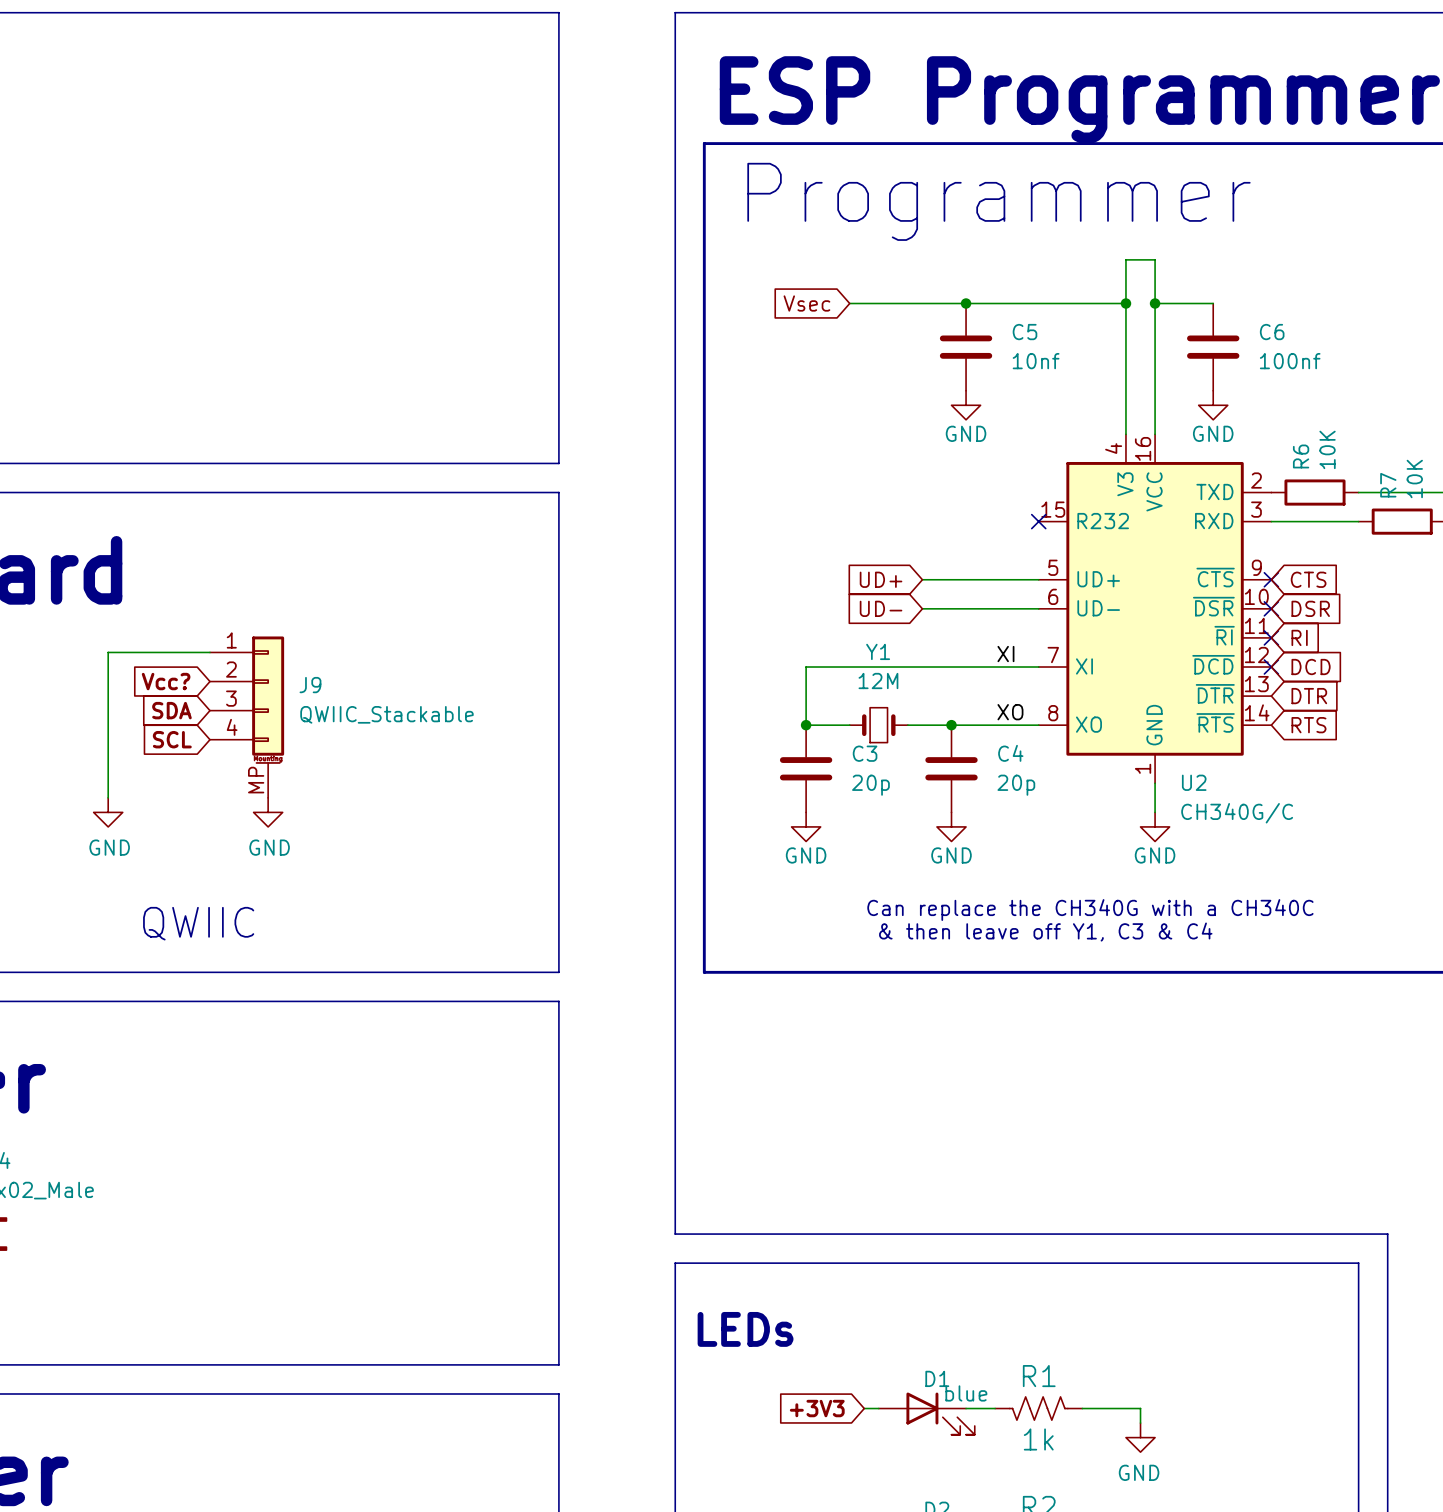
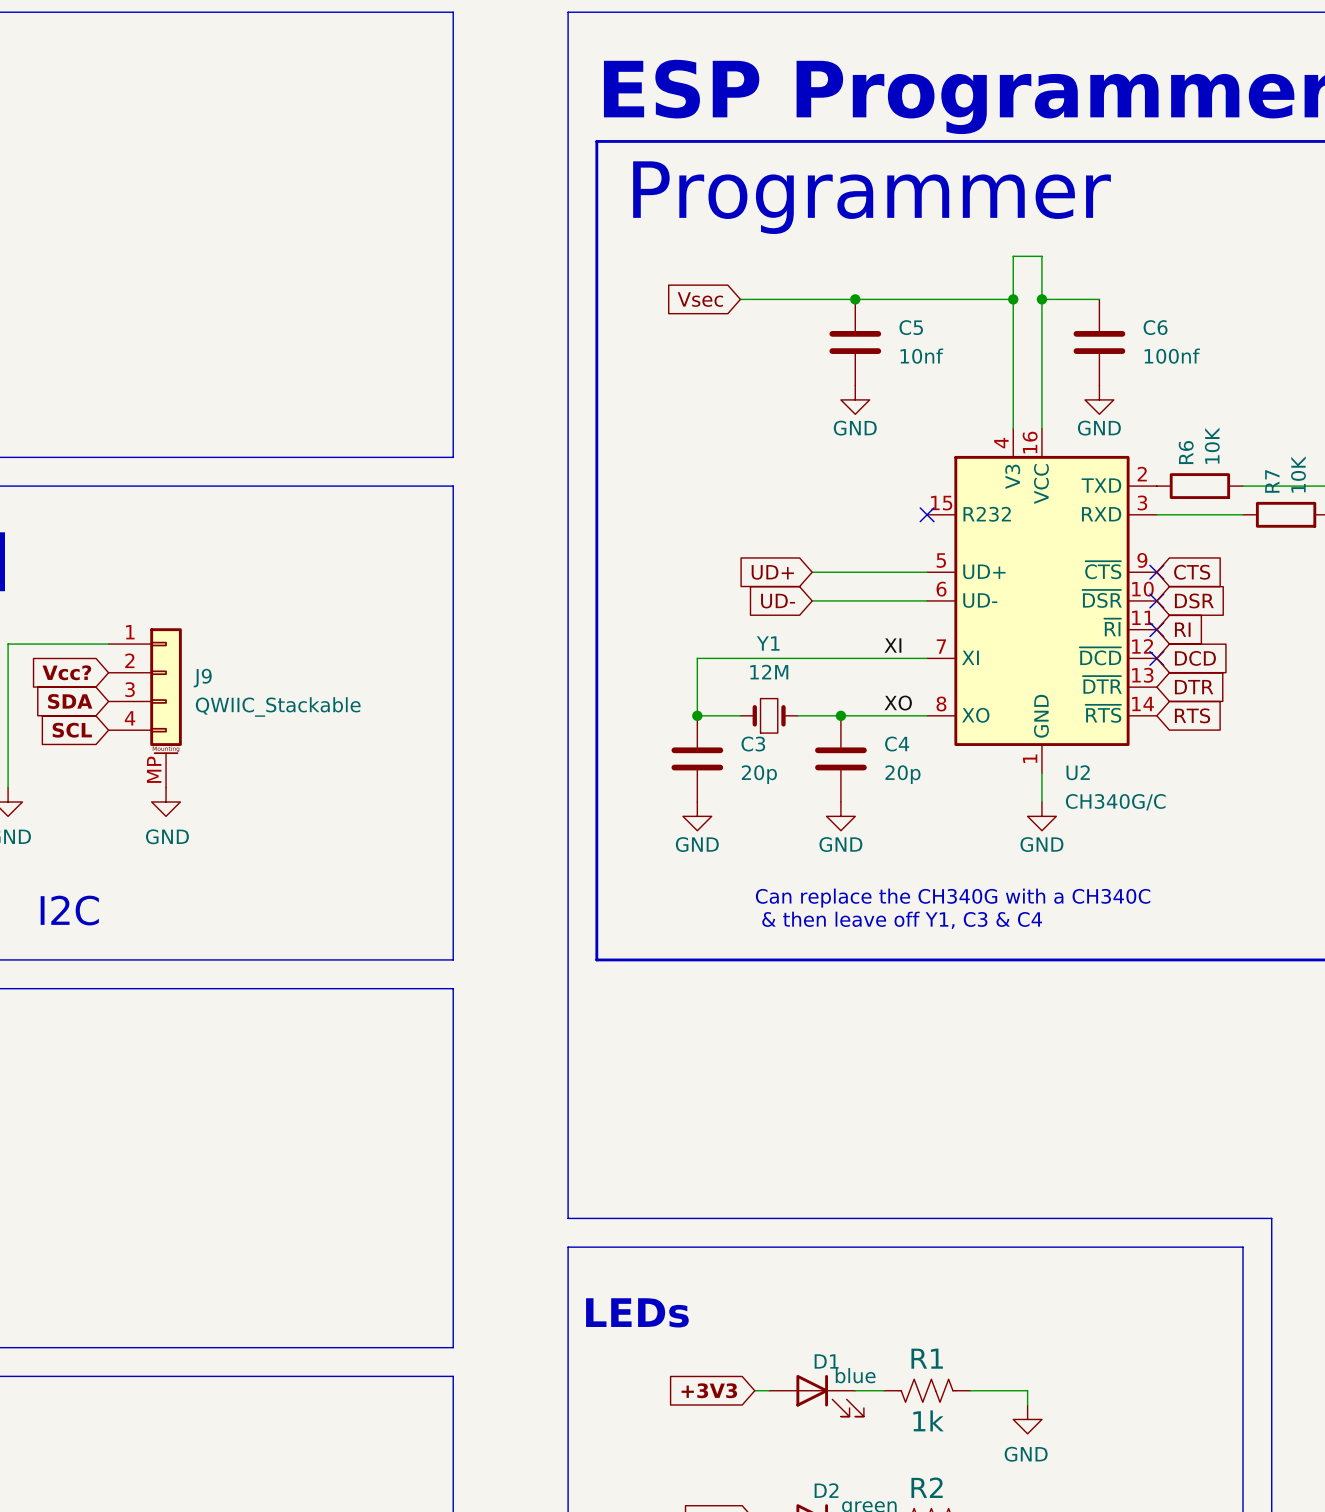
text: QWIIC (198, 923) -> I2C (69, 910)

